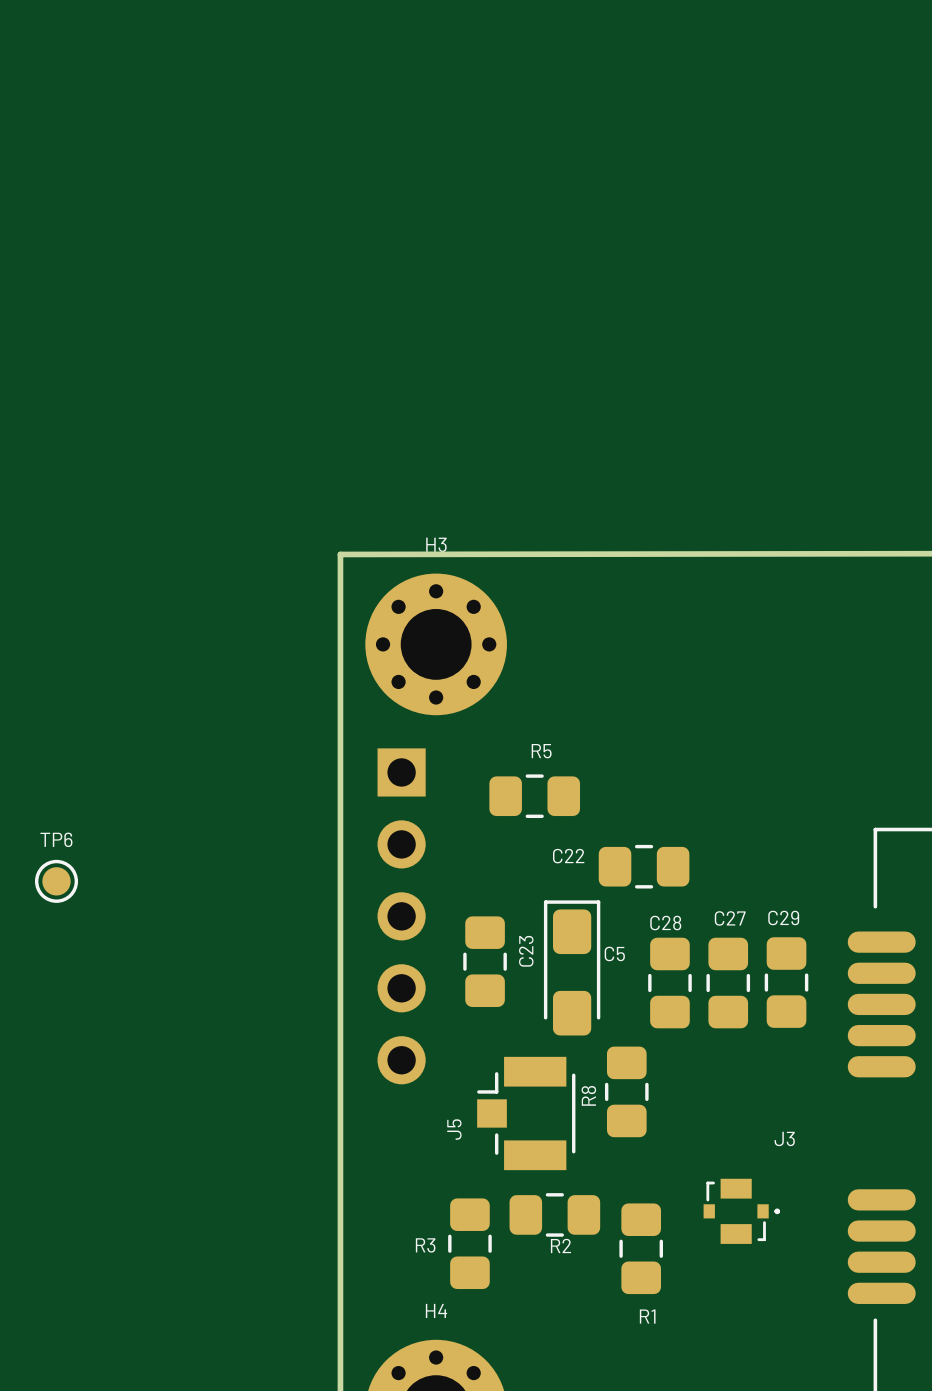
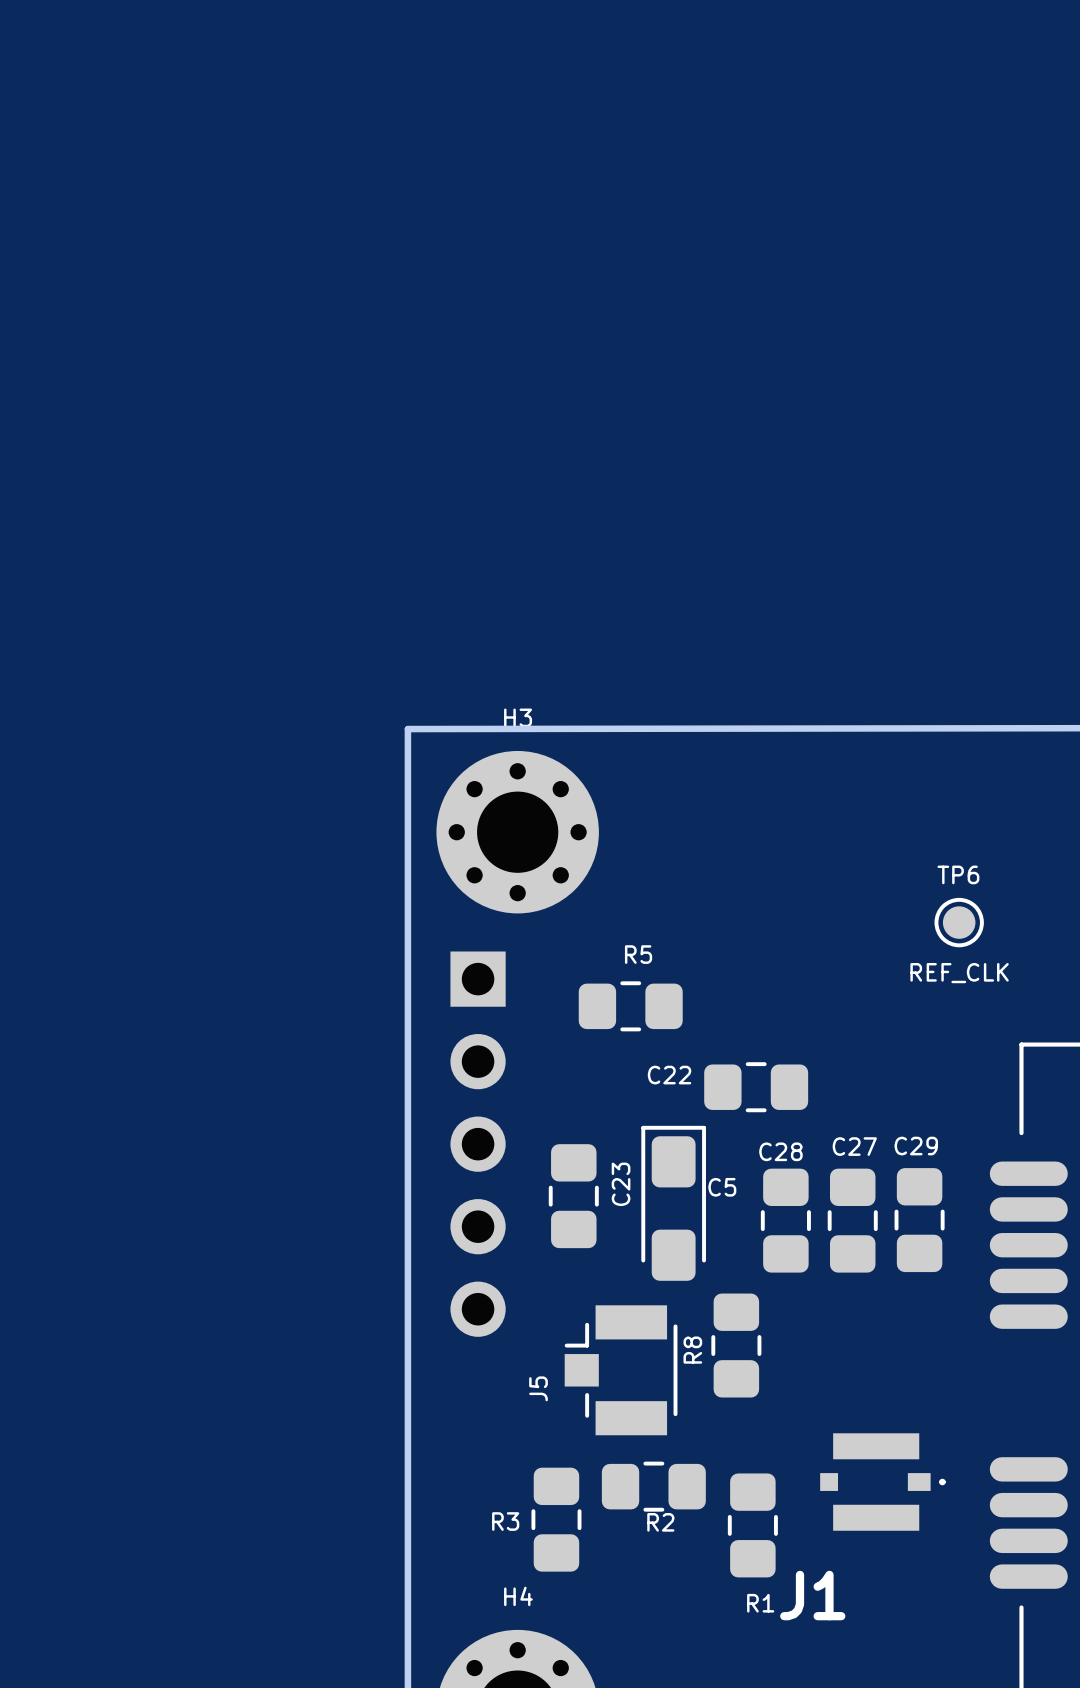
TP6 value: none -> REF_CLK (959, 973)
TP6 position: (56, 881) -> (959, 922)
J1: none -> (882, 1482)
J3: (741, 1211) -> none

